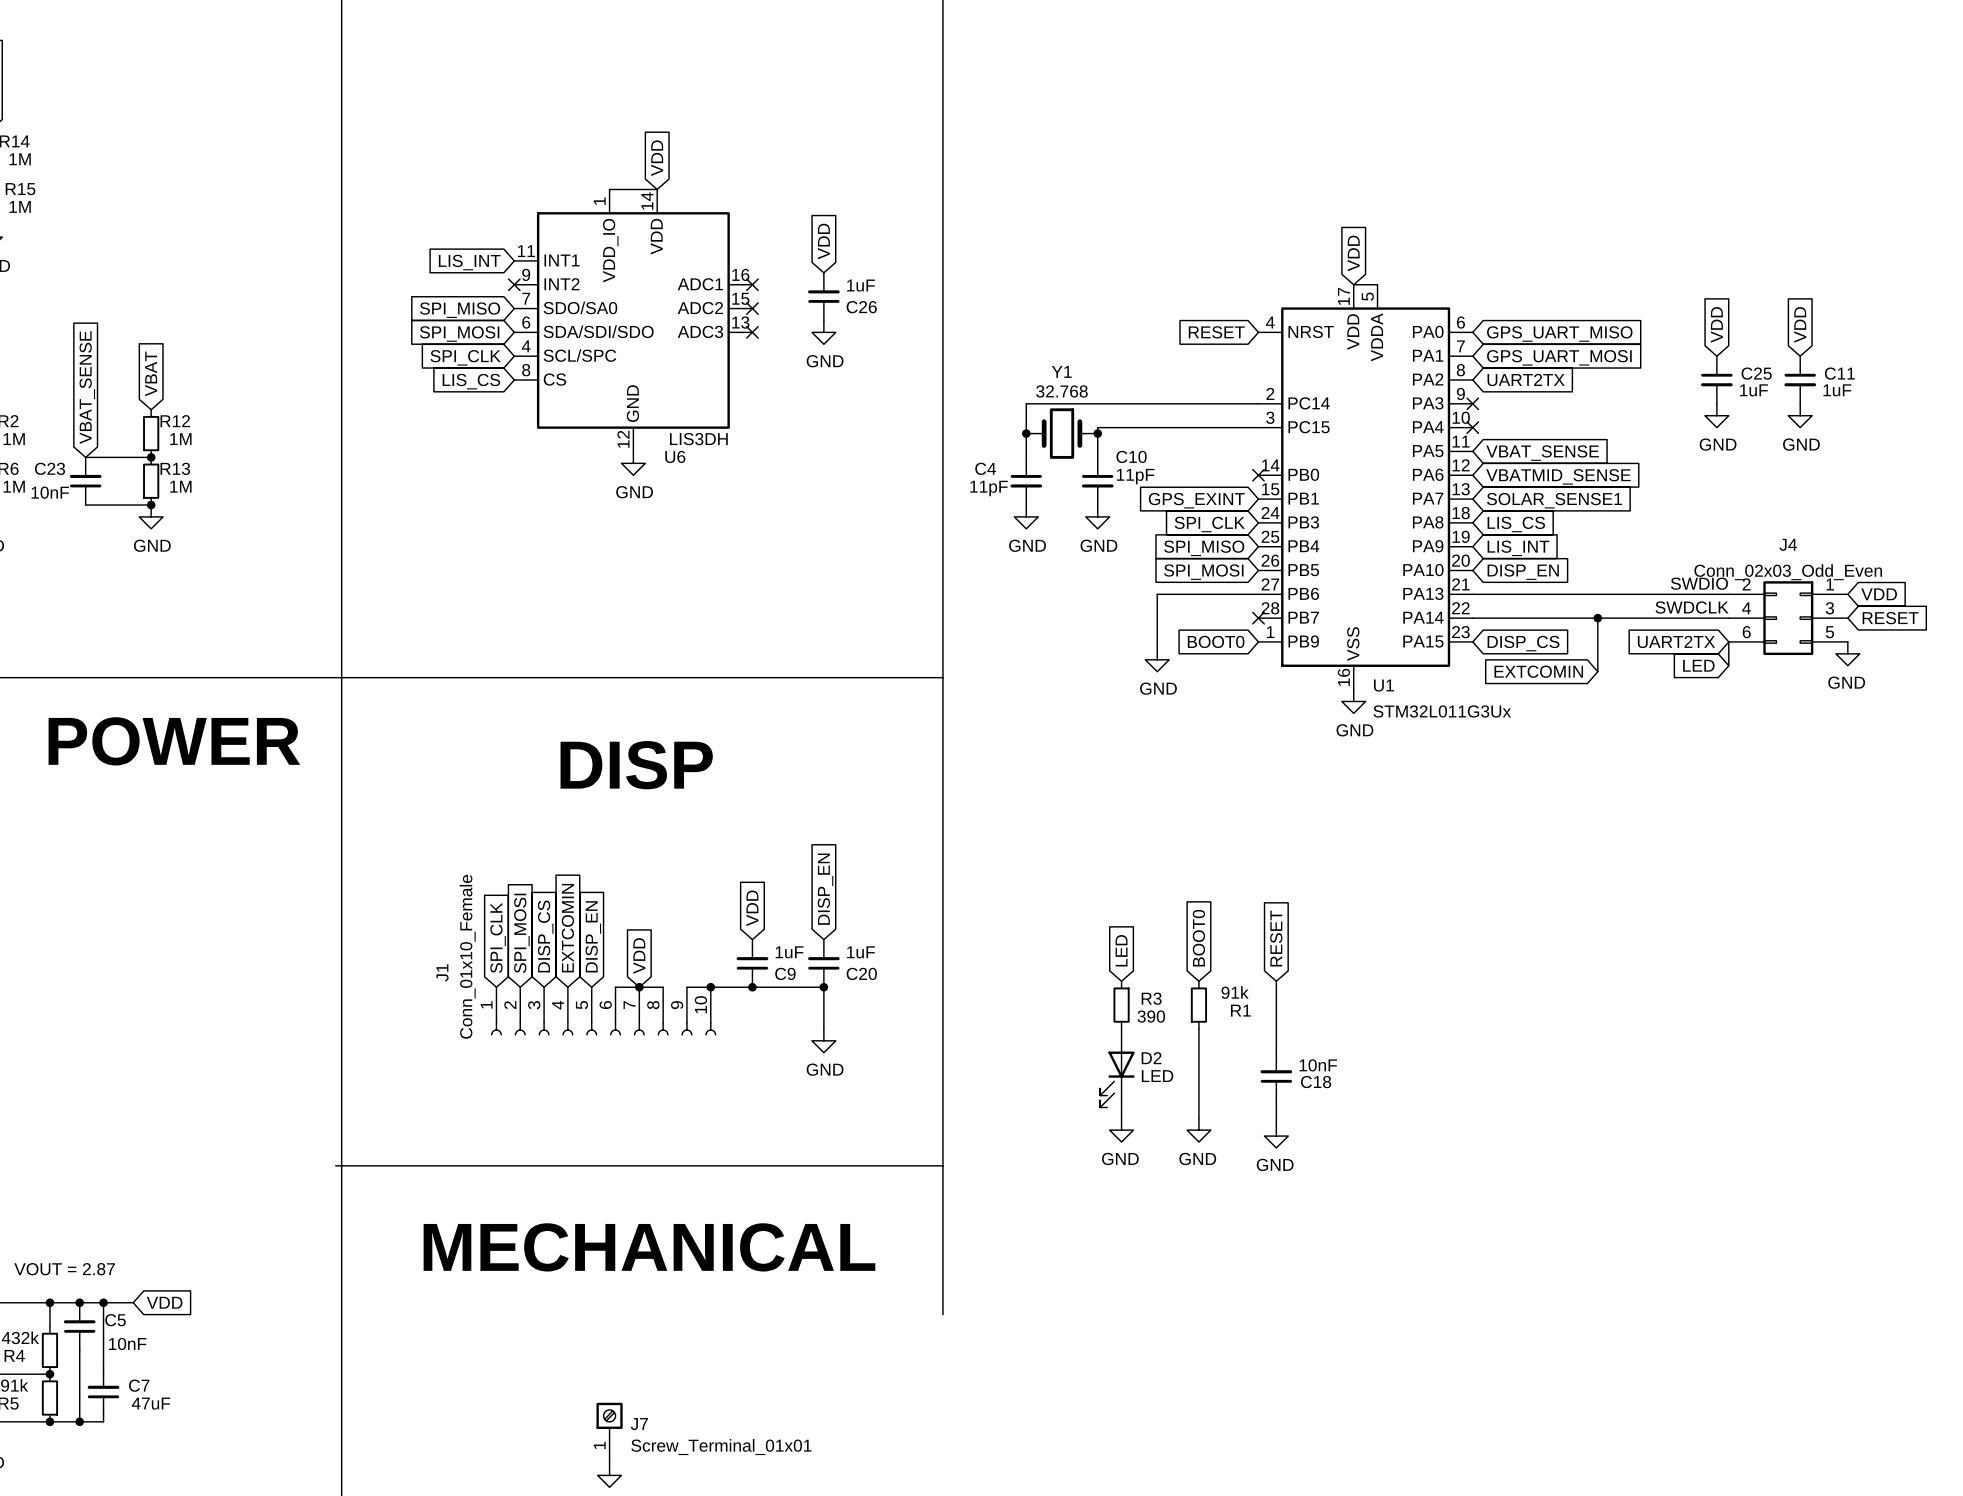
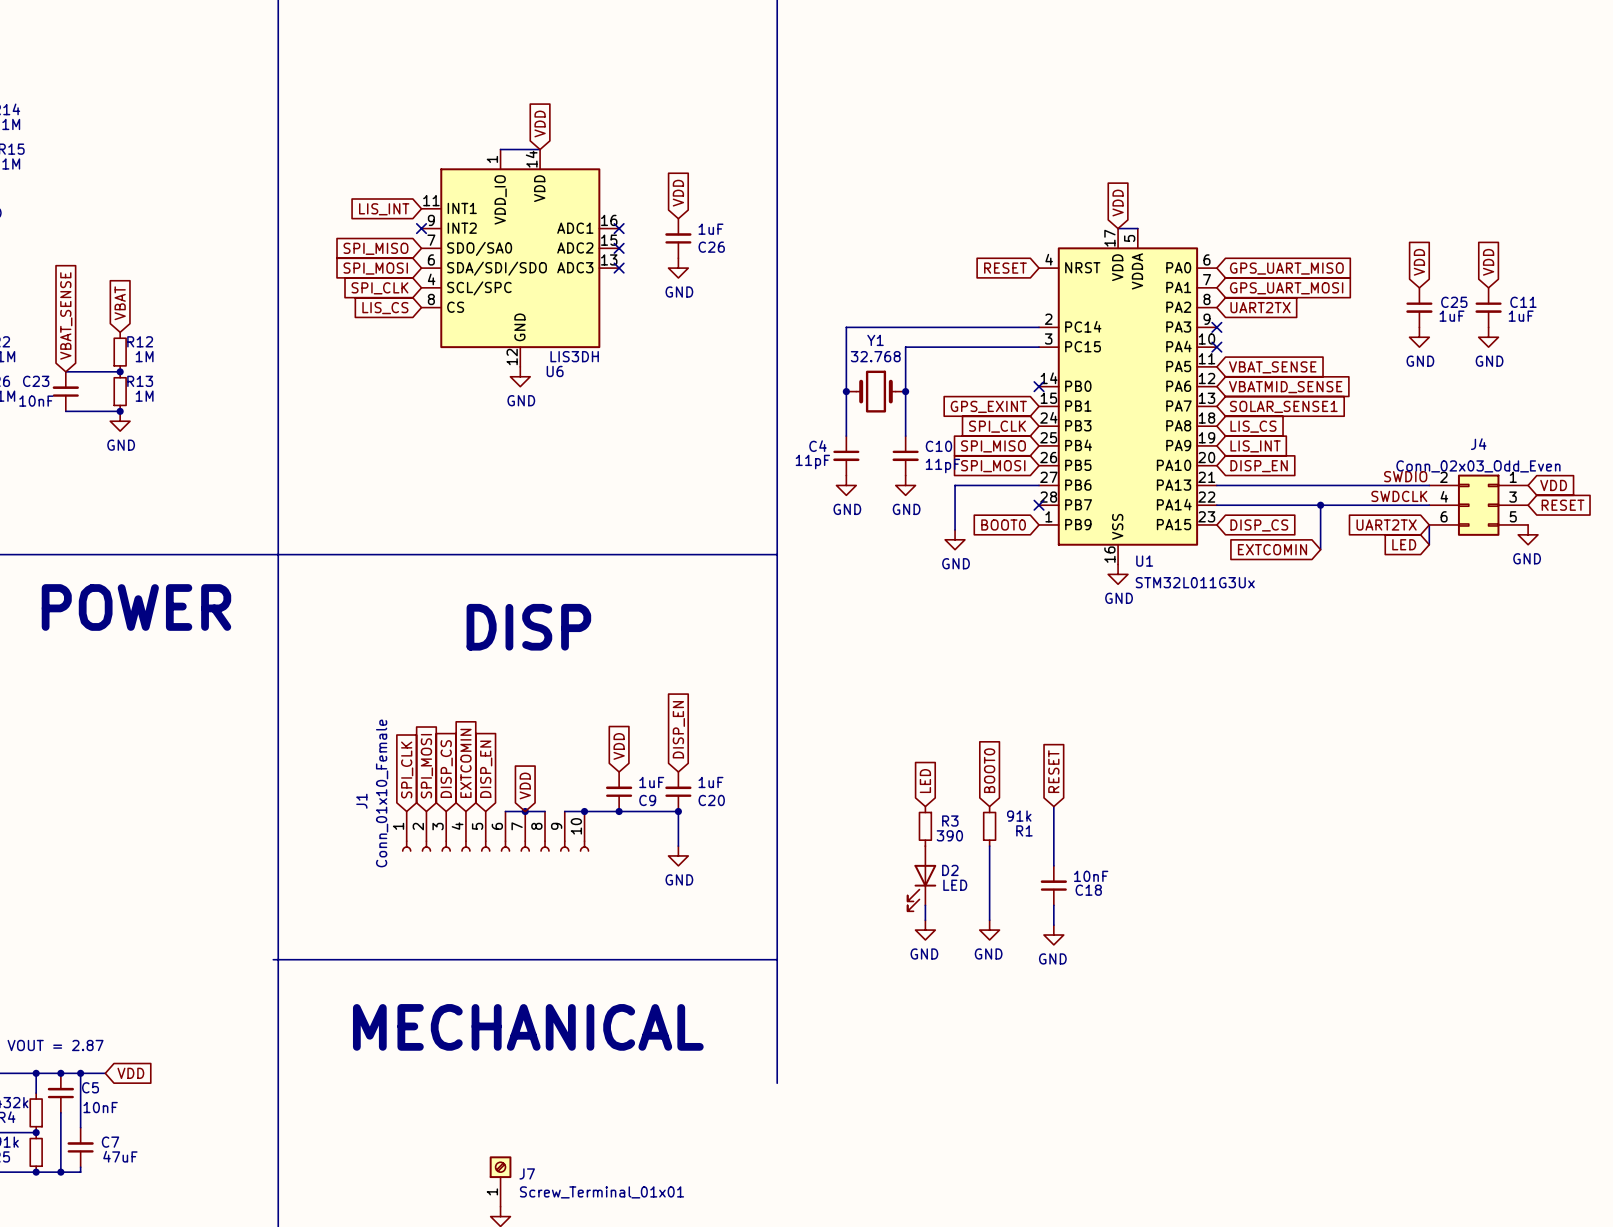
junction: (1026, 433) -> none
Y1 position: (1062, 433) -> (876, 391)
junction: (1097, 433) -> none
C10 name position: C10 (1131, 456) -> C10 (938, 446)
C4 name position: C4 (985, 468) -> C4 (817, 446)
C10 value position: 11pF (1135, 476) -> 11pF (942, 465)
junction: none -> (846, 391)
C4 position: (1026, 481) -> (846, 455)
junction: none -> (905, 391)
C10 position: (1097, 481) -> (905, 455)
power symbol: GND (1026, 516) -> none
power symbol: GND (1097, 516) -> none
power symbol: none -> GND (846, 485)
power symbol: none -> GND (905, 485)

